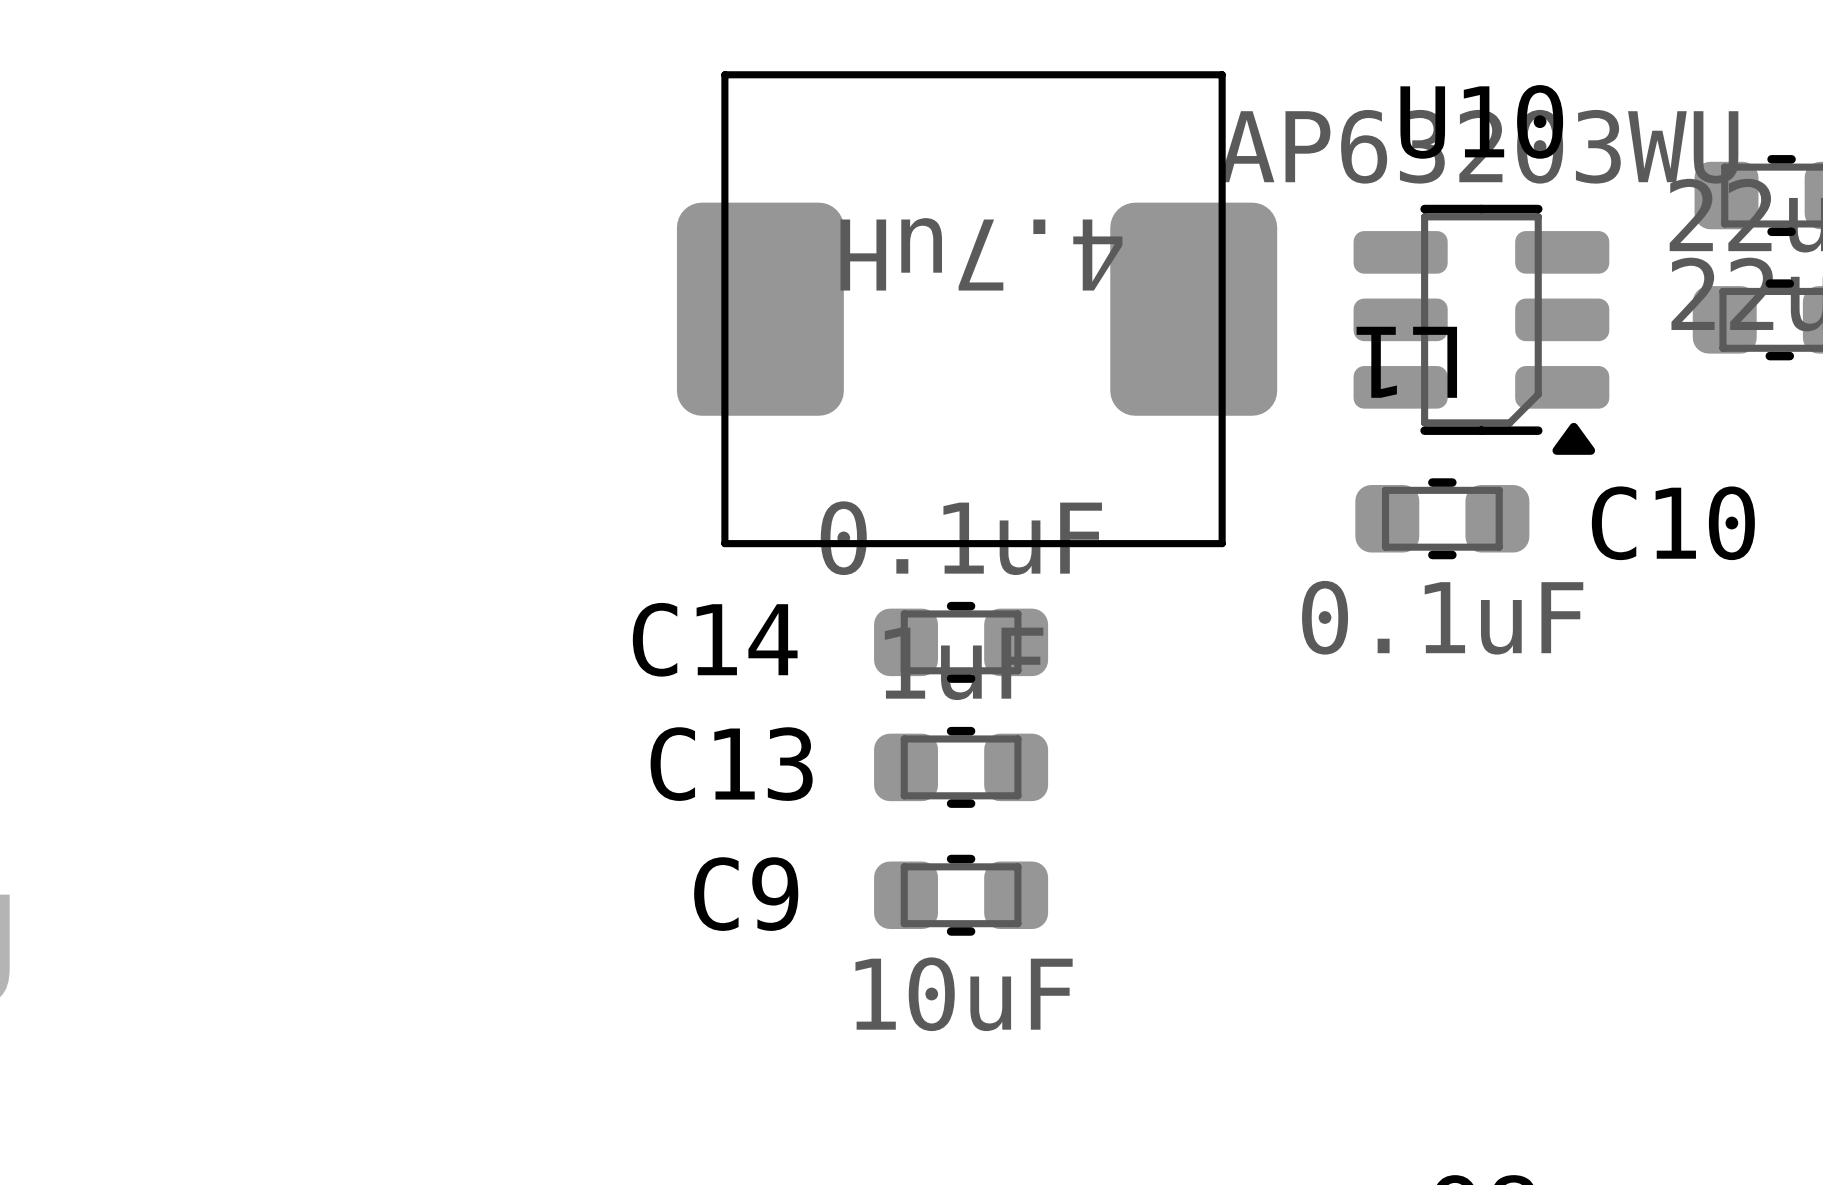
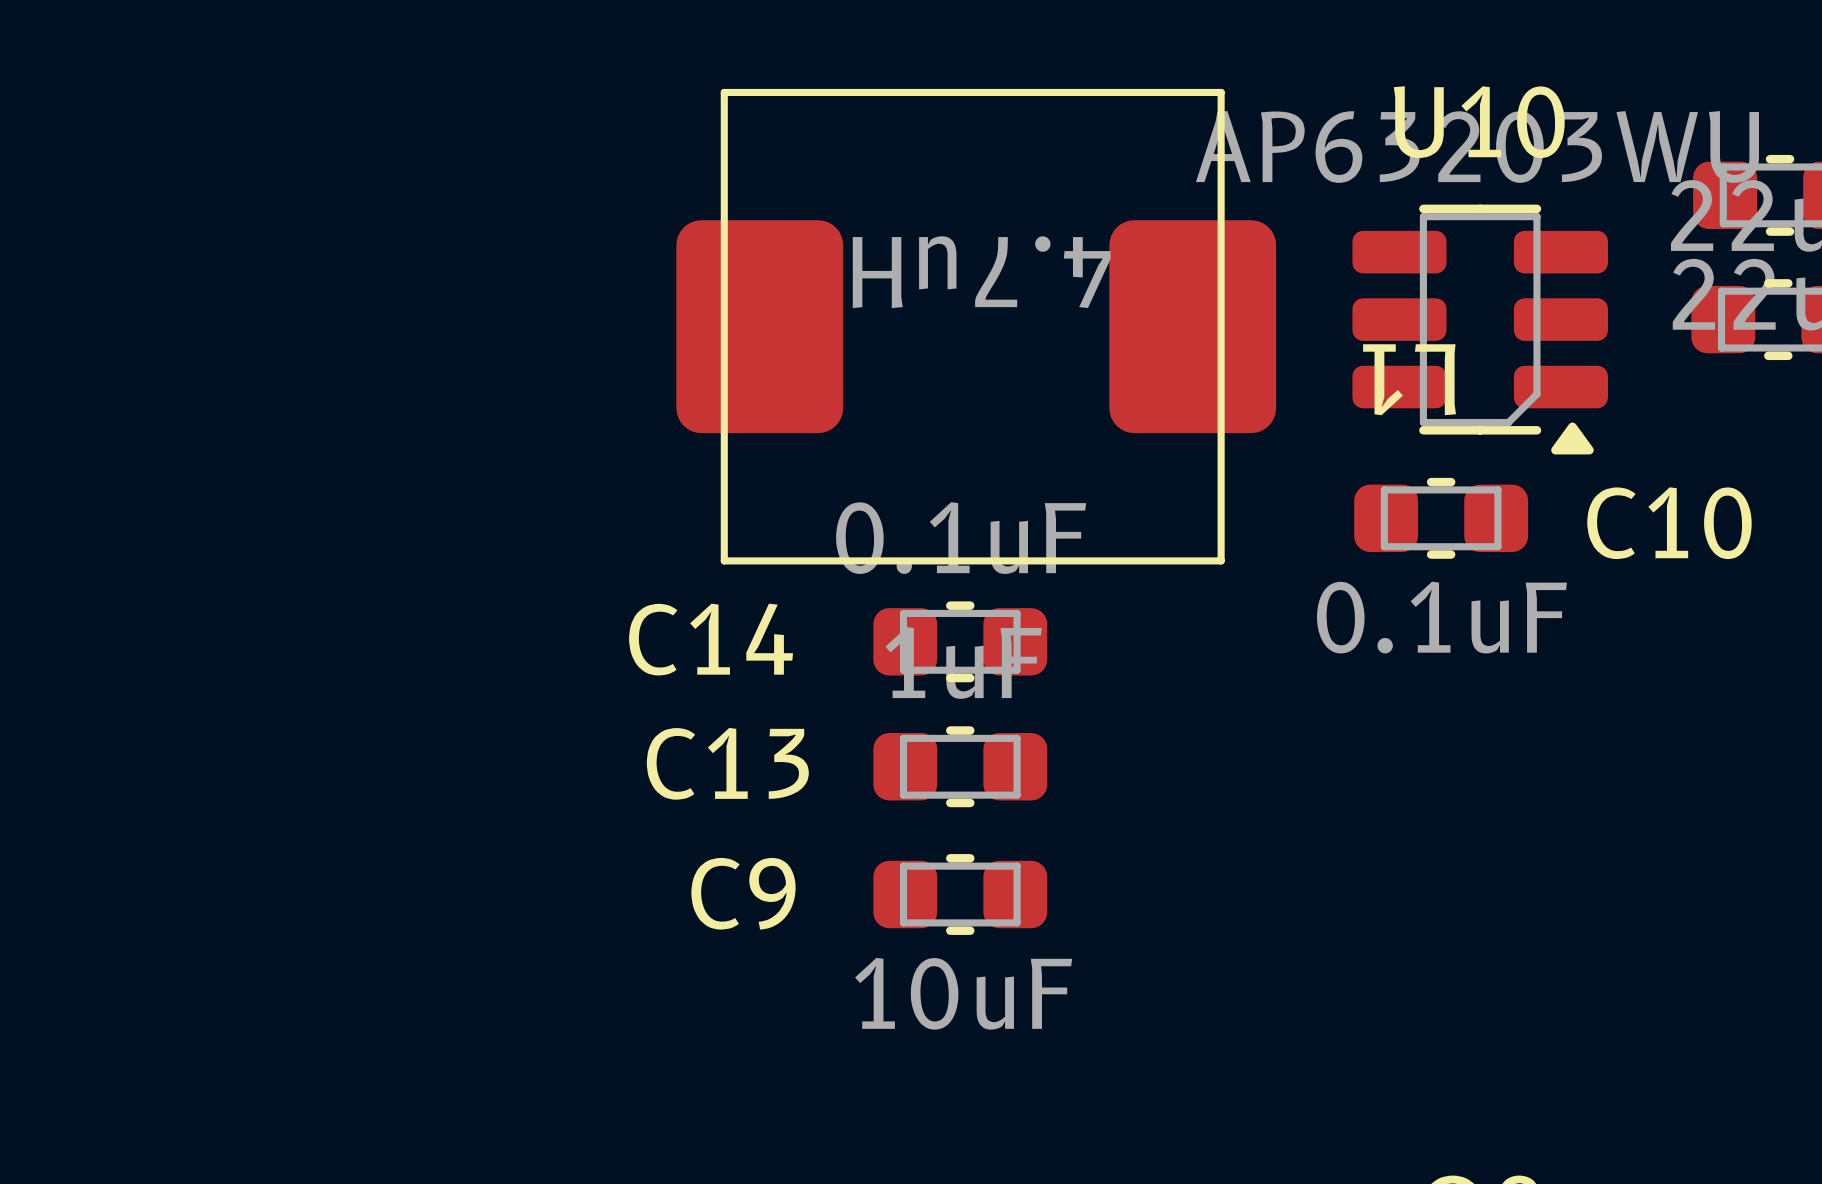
L1 position: (977, 309) -> (976, 326)

